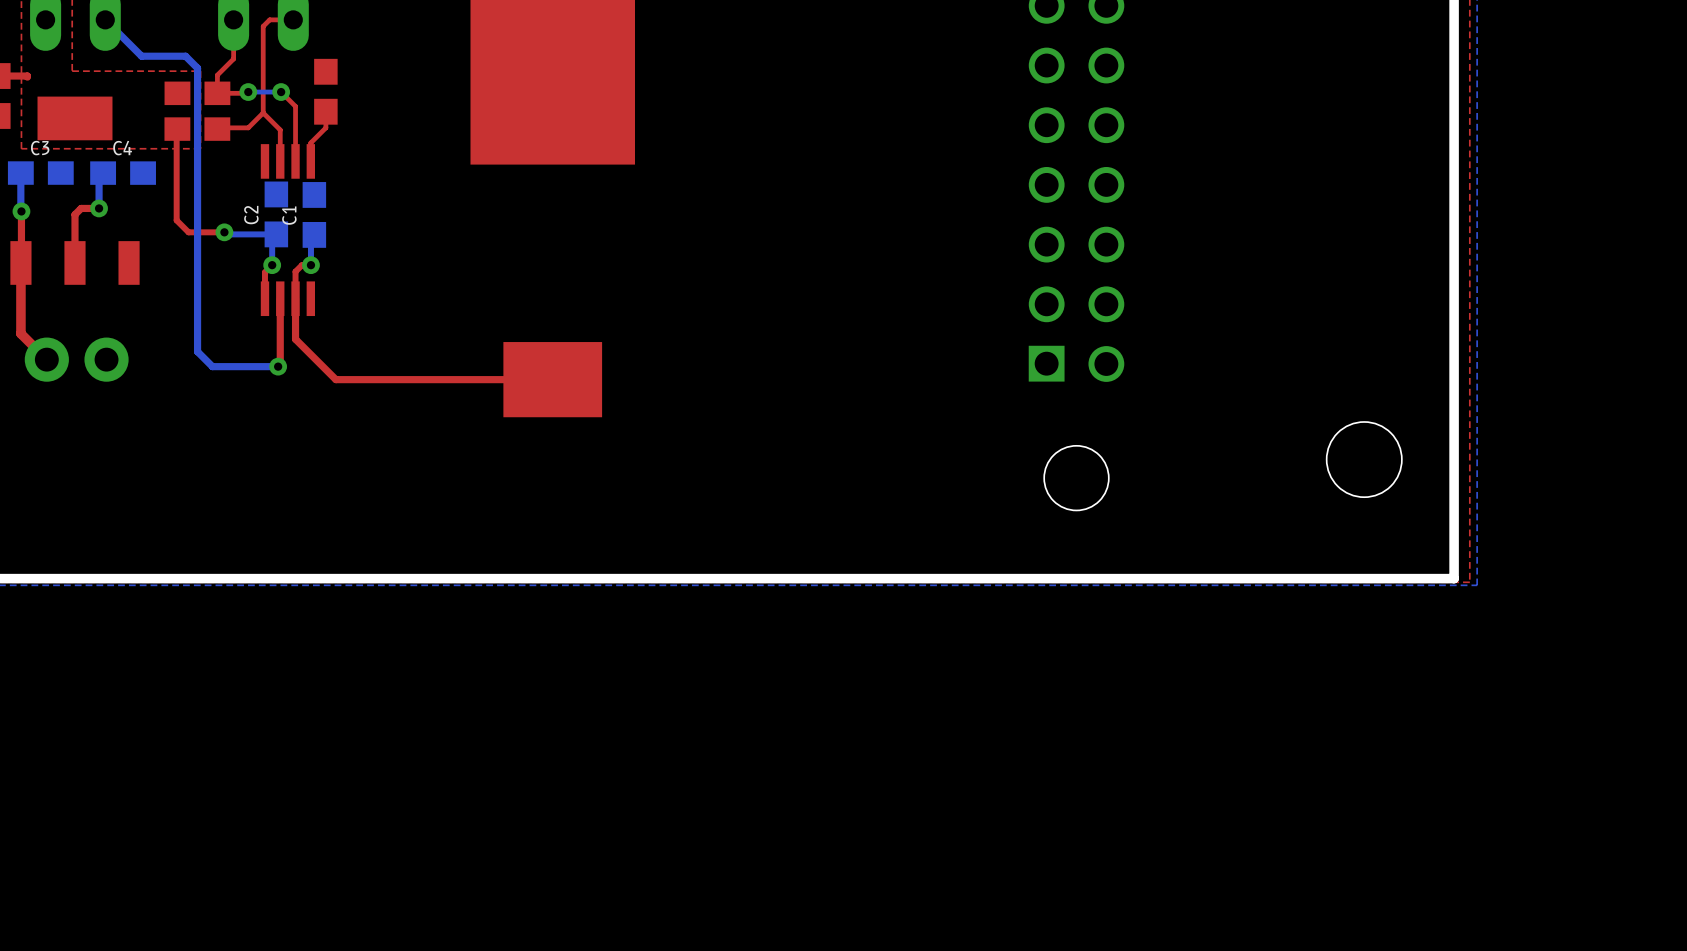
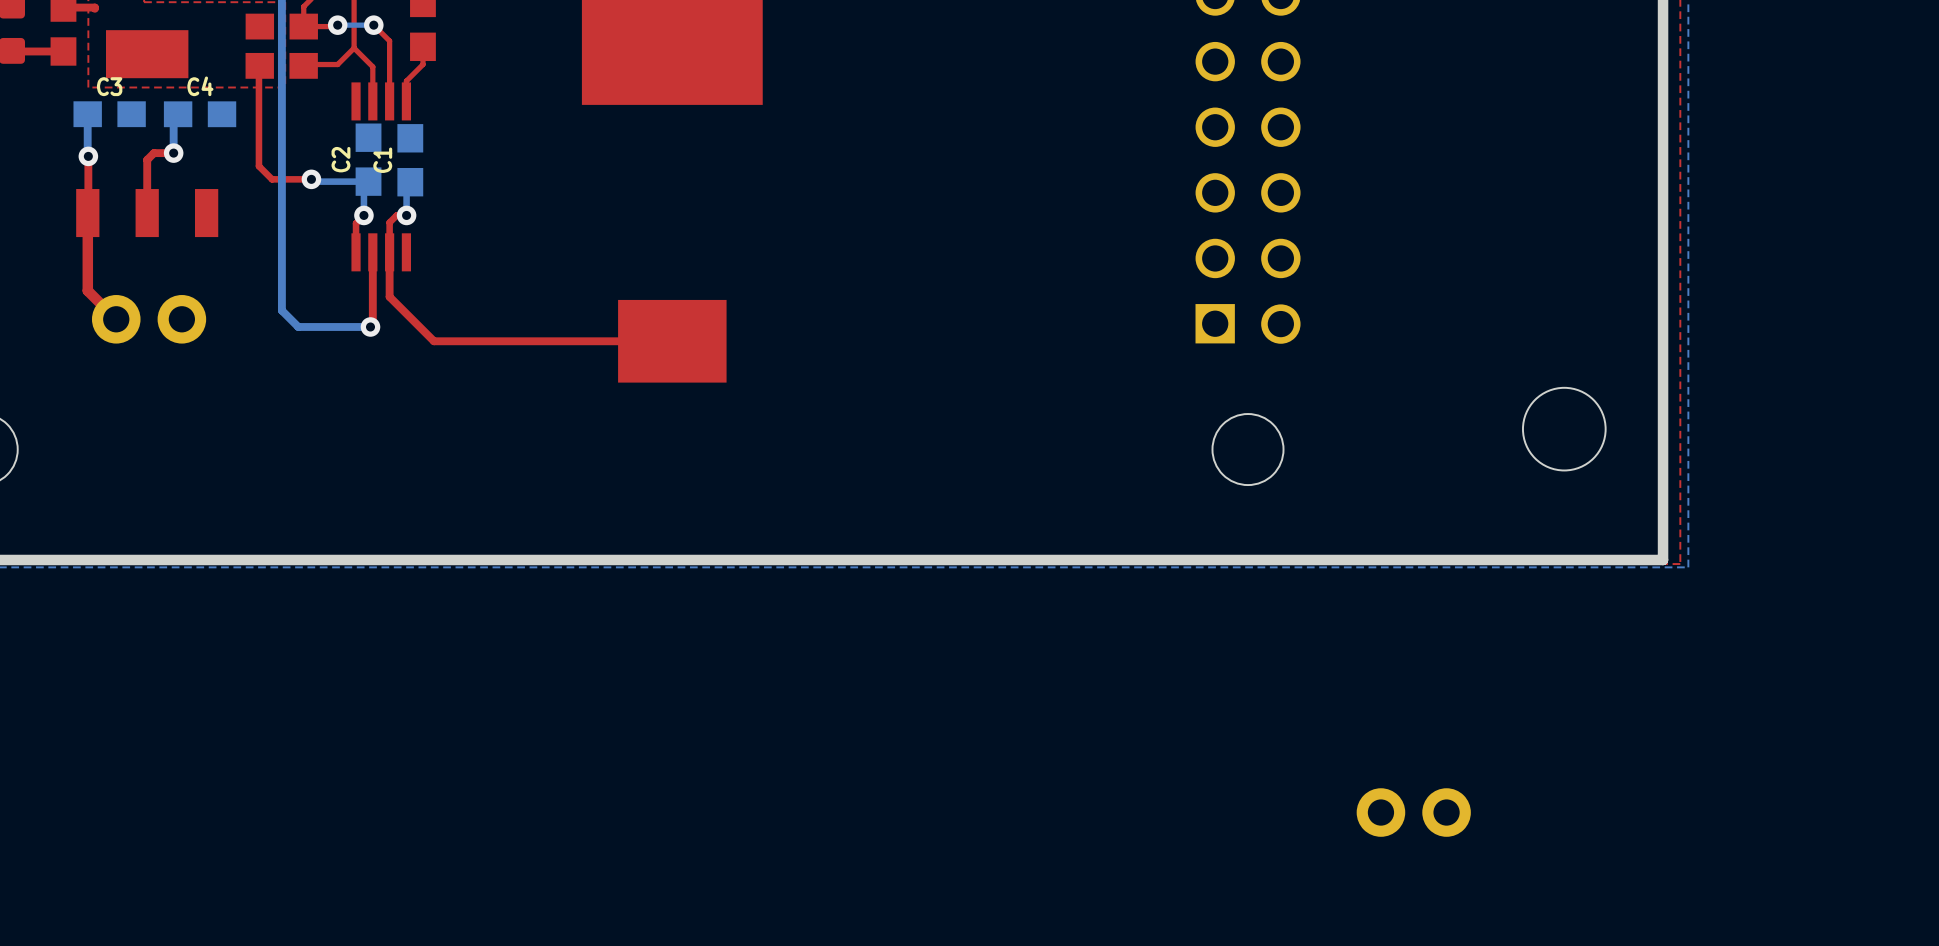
part: none -> (1413, 812)

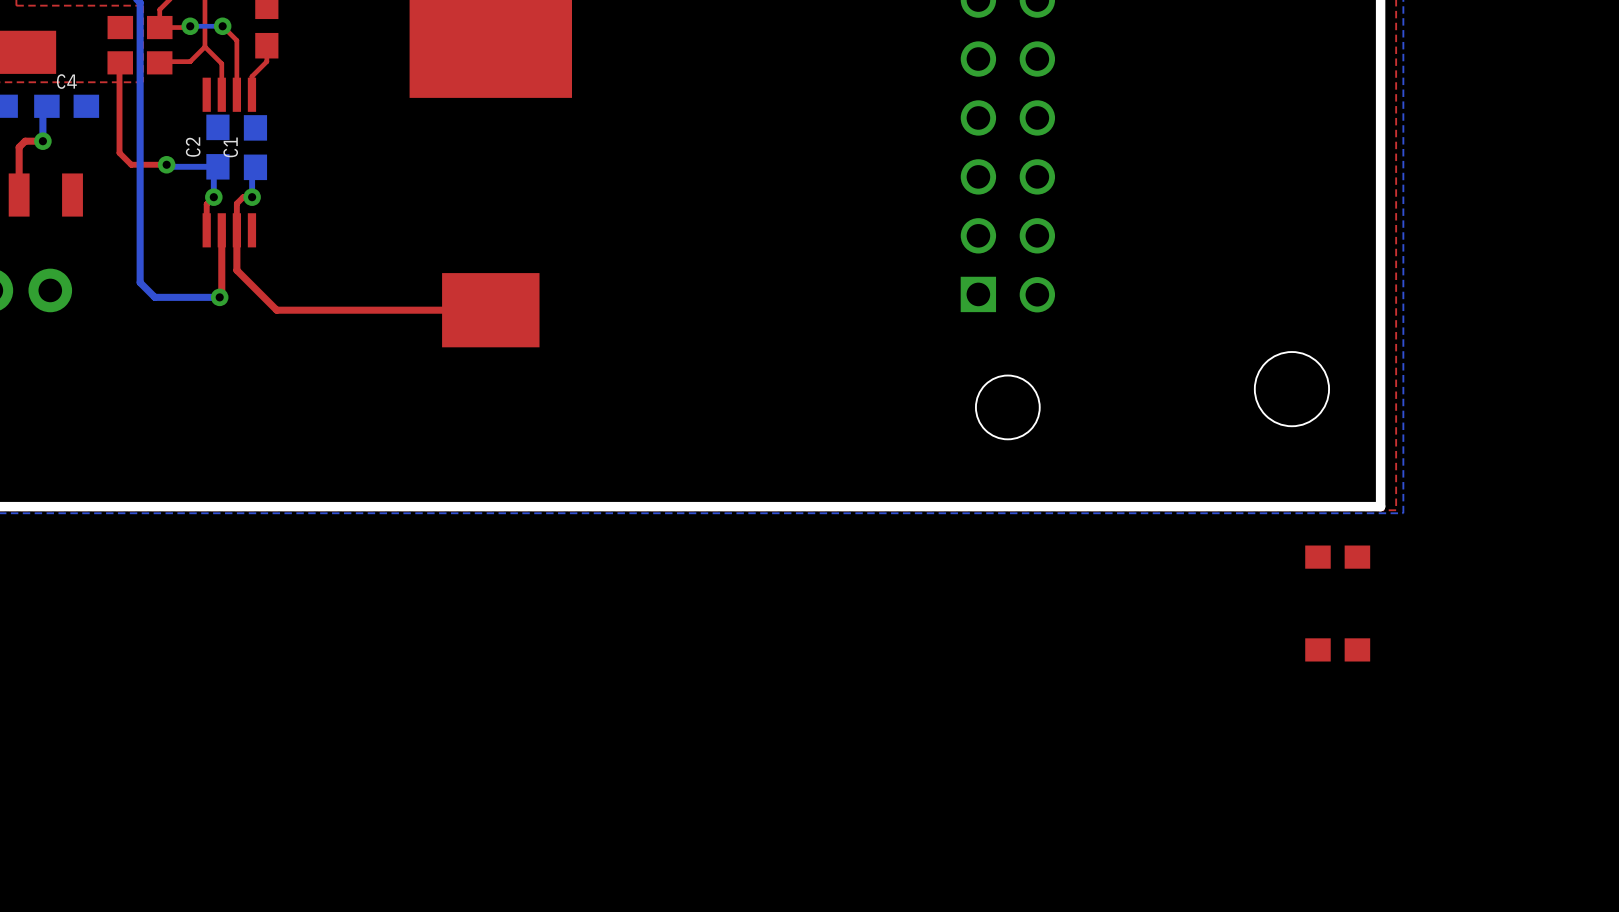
part: none -> (1337, 557)
part: none -> (1337, 649)
part: (1413, 812) -> none

